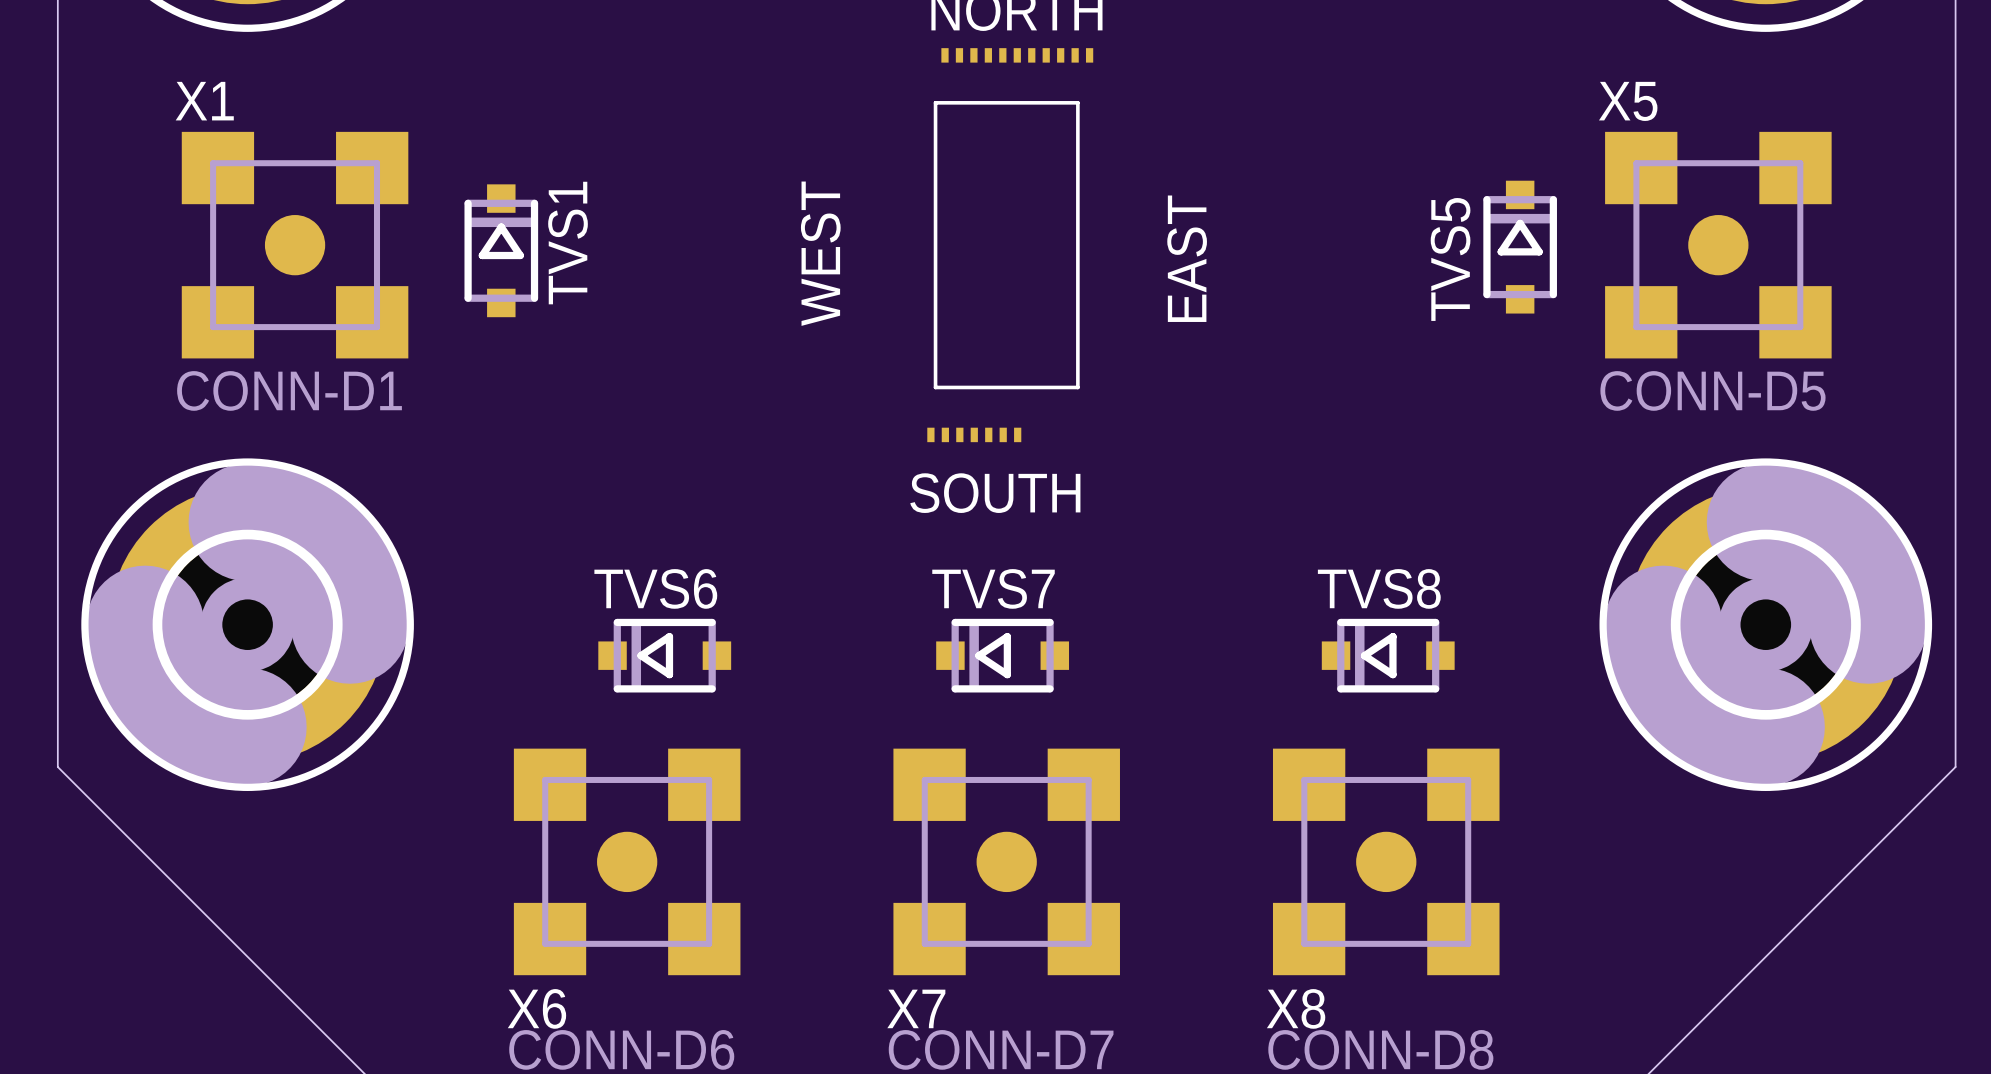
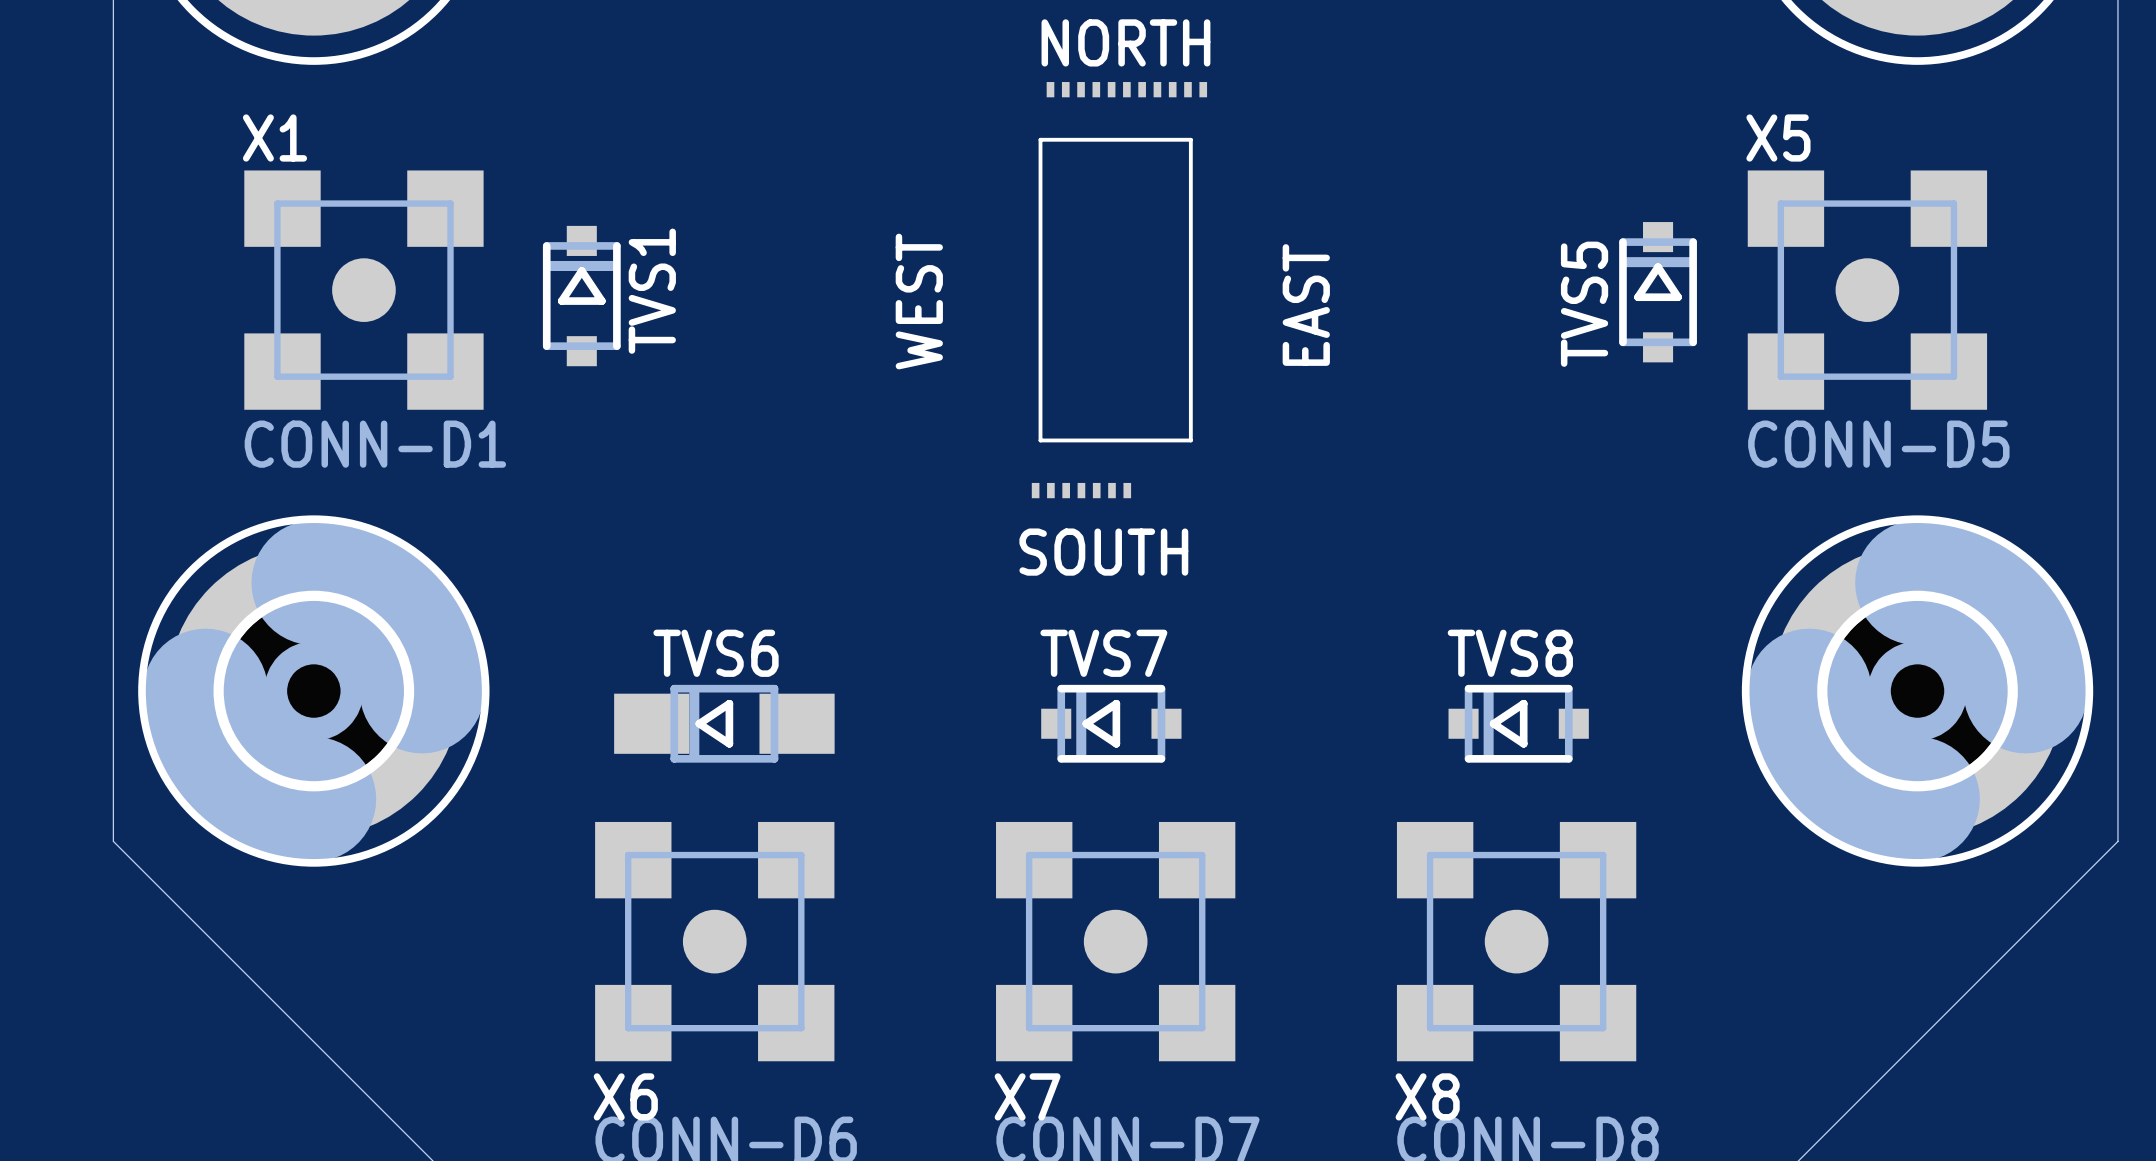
TVS6 footprint: [598, 618, 732, 693] -> [614, 684, 835, 763]

